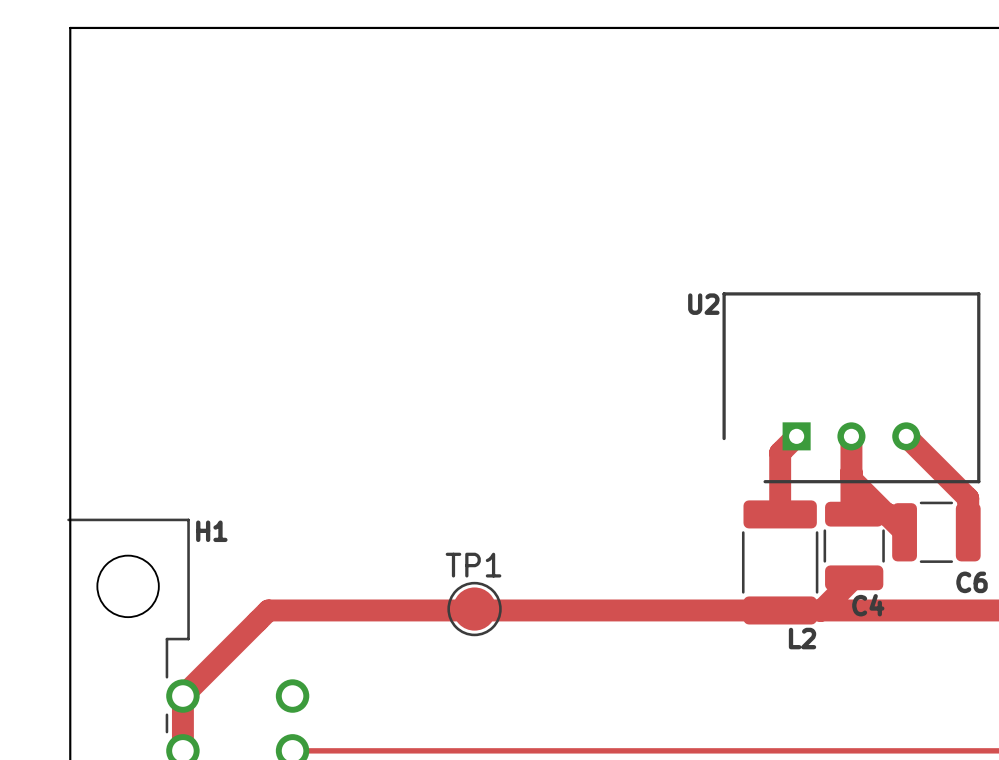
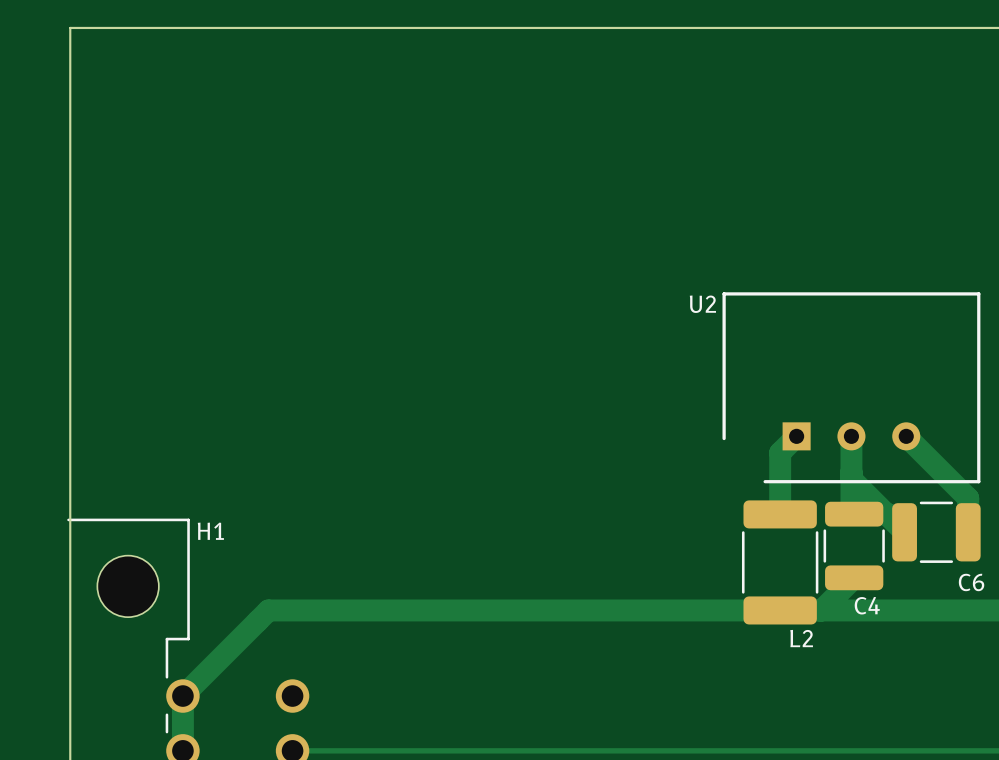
TP1: (474, 609) -> none

